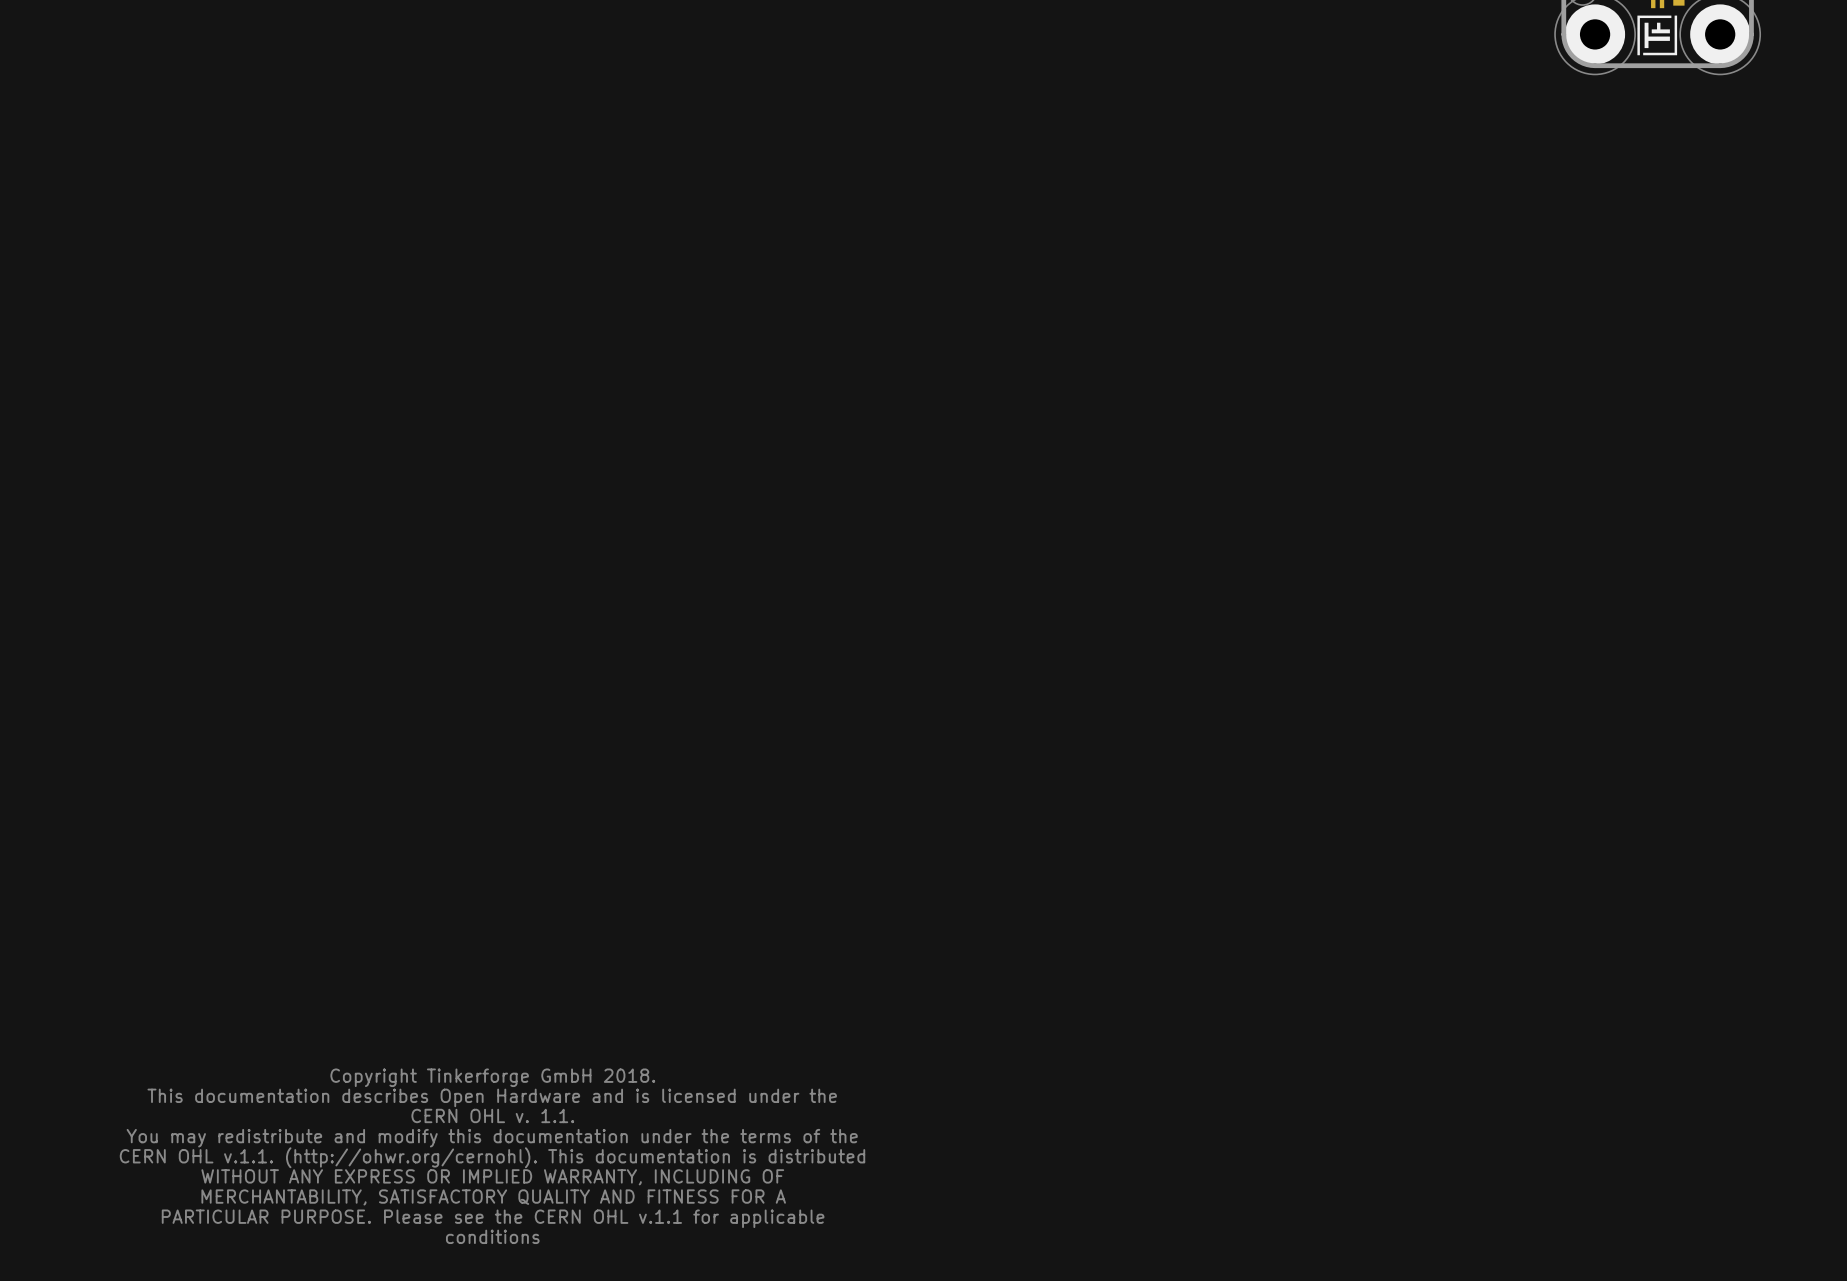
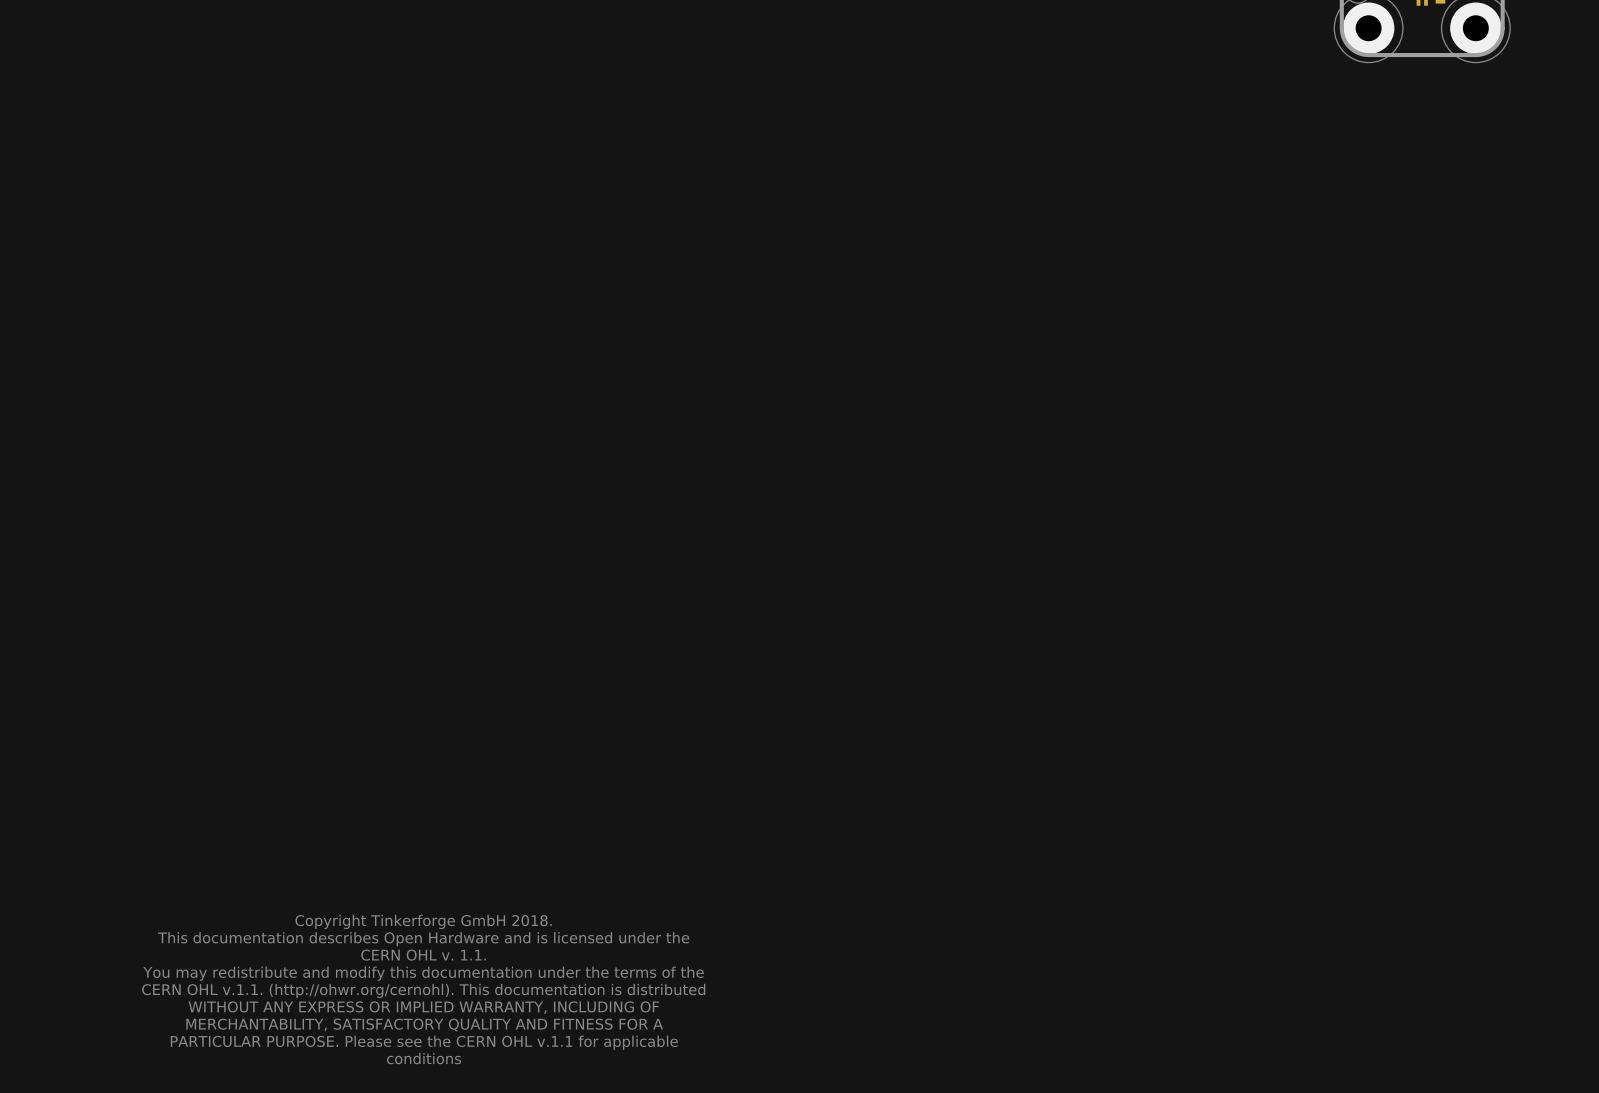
drawing: [1637, 15, 1678, 56] -> none

